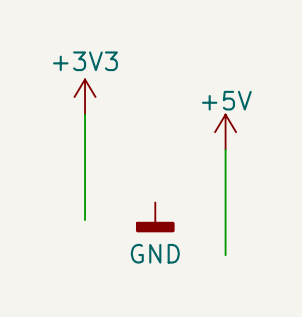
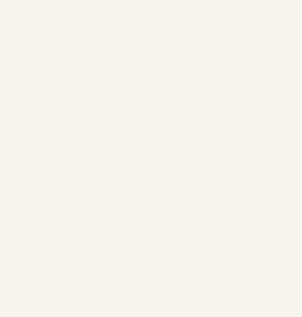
power symbol: +3V3 (85, 97) -> none
wire: (85, 114) (85, 220) -> none
power symbol: +5V (225, 132) -> none
wire: (225, 149) (225, 255) -> none
power symbol: GND (155, 217) -> none

